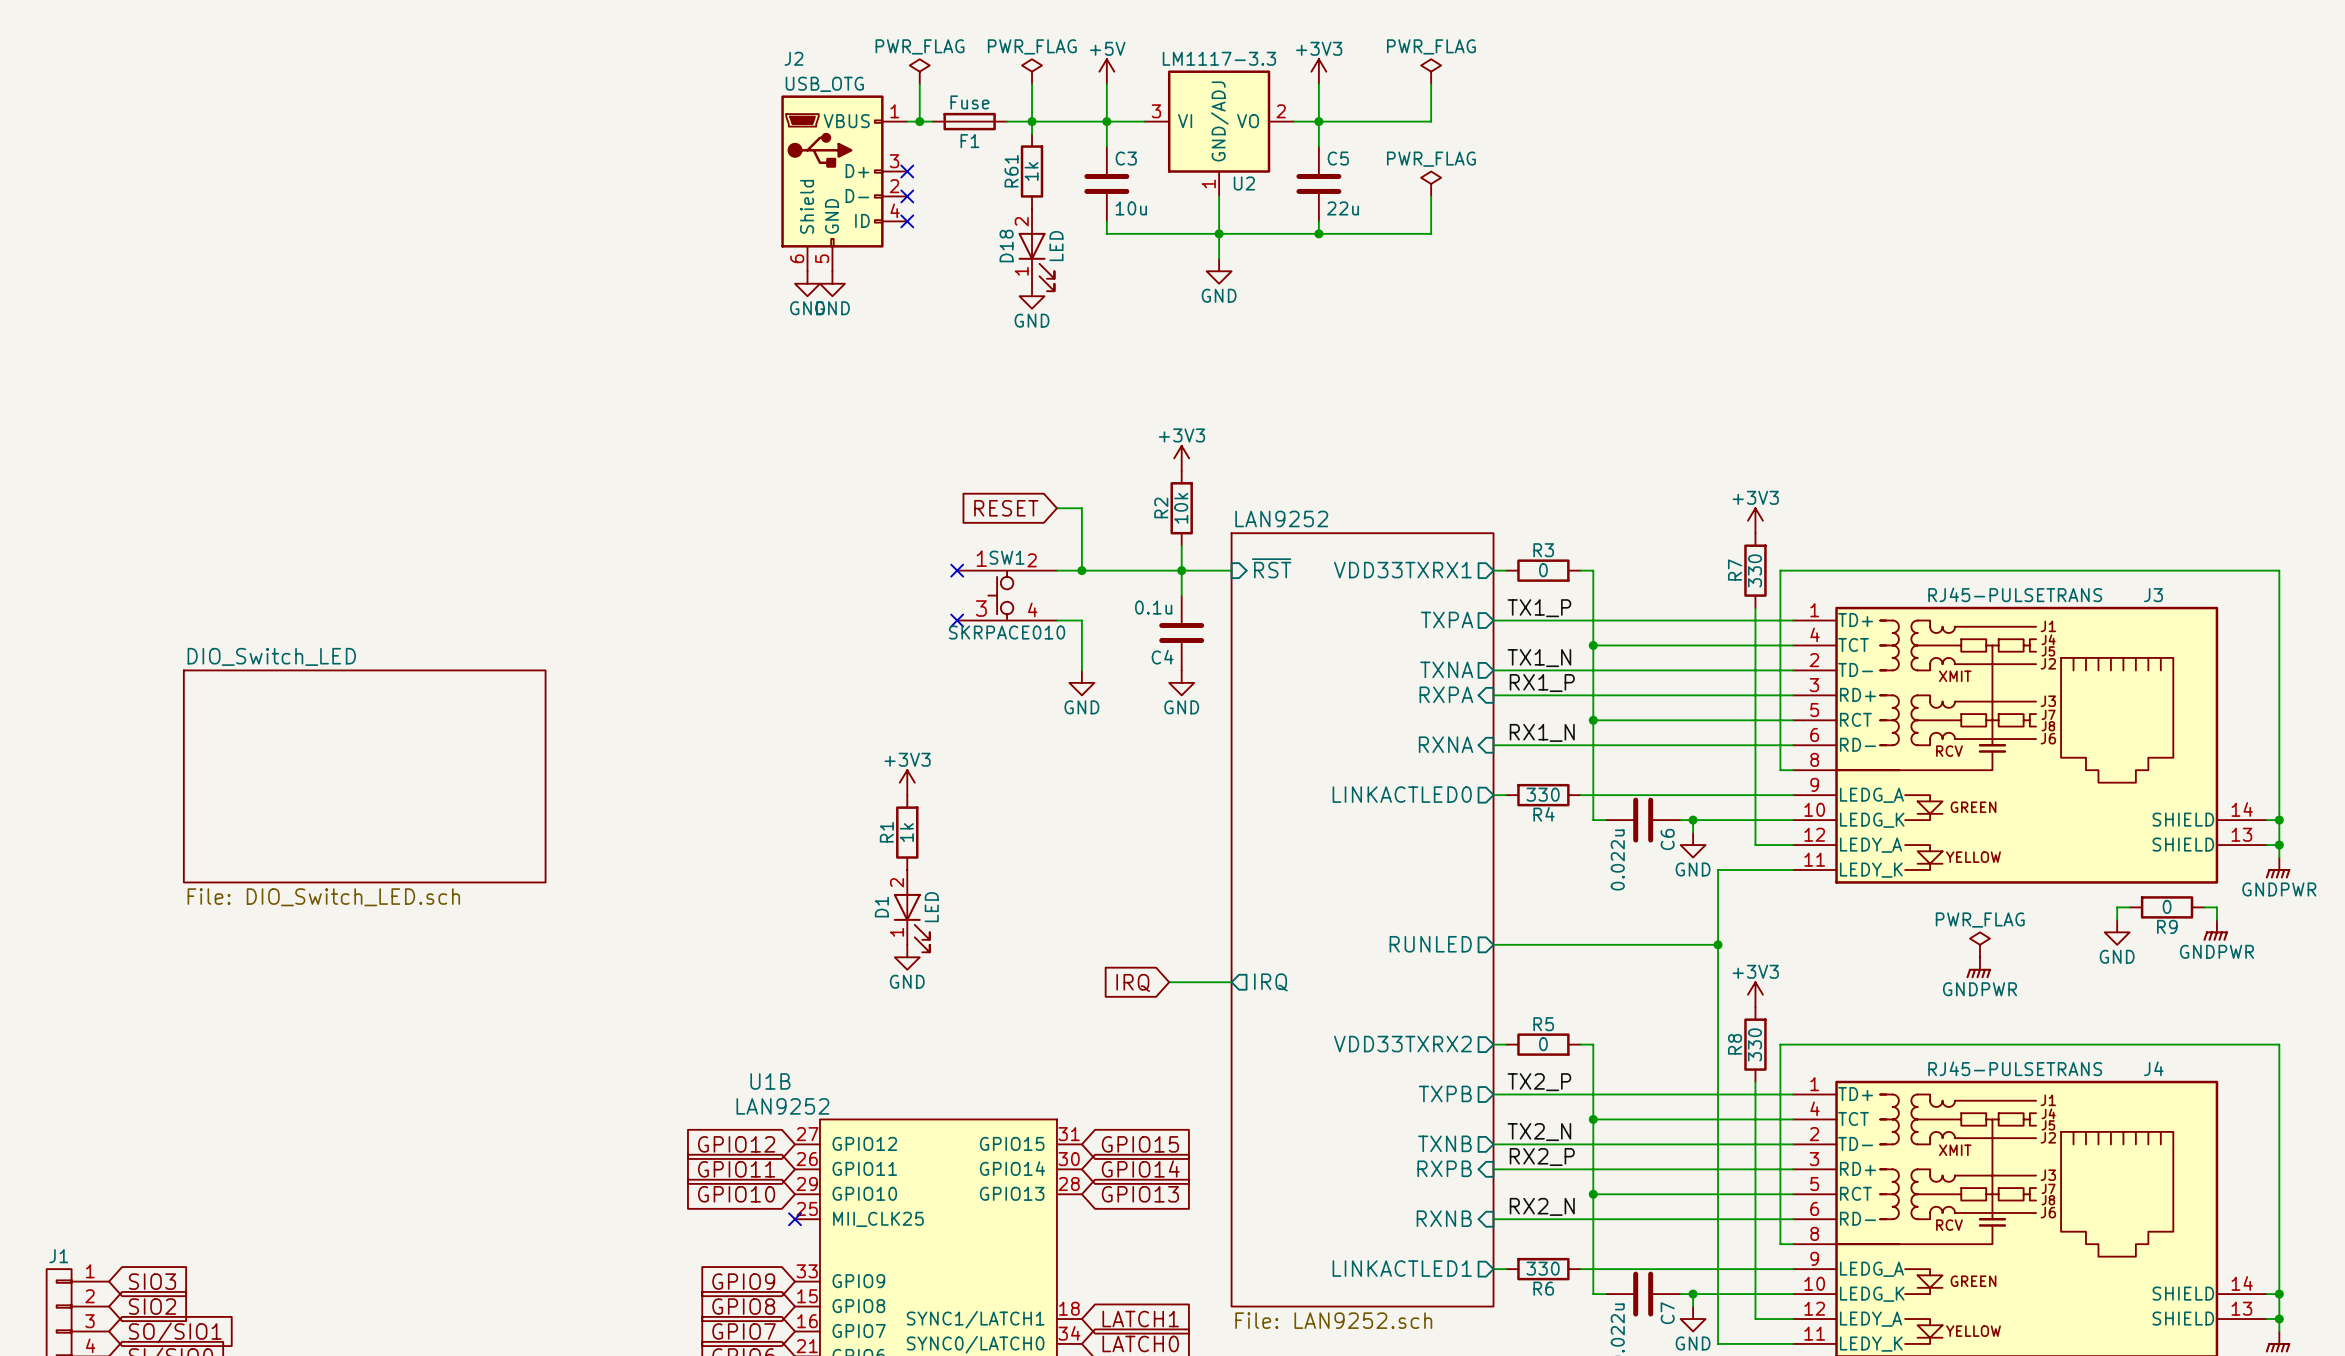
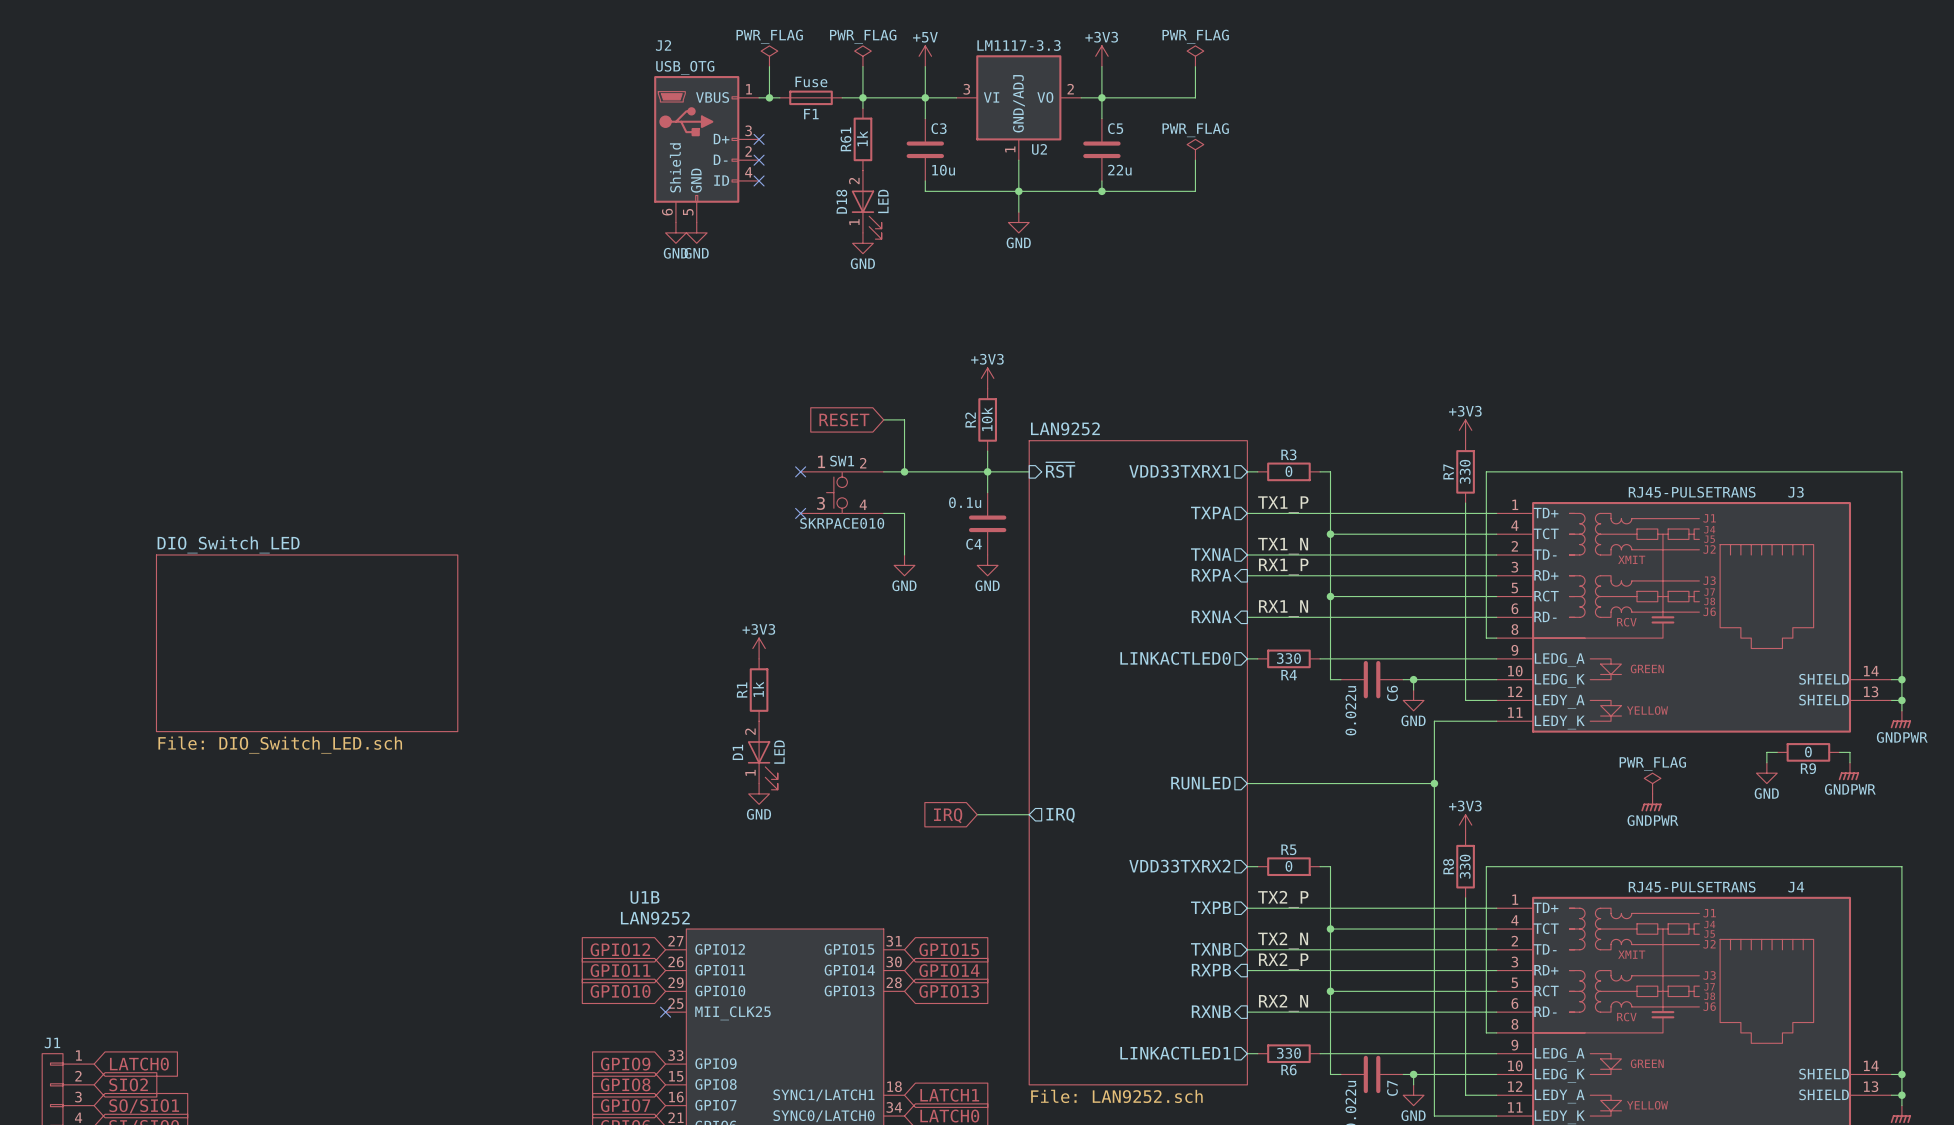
global label: SIO3 (152, 1281) -> LATCH0 (139, 1064)

